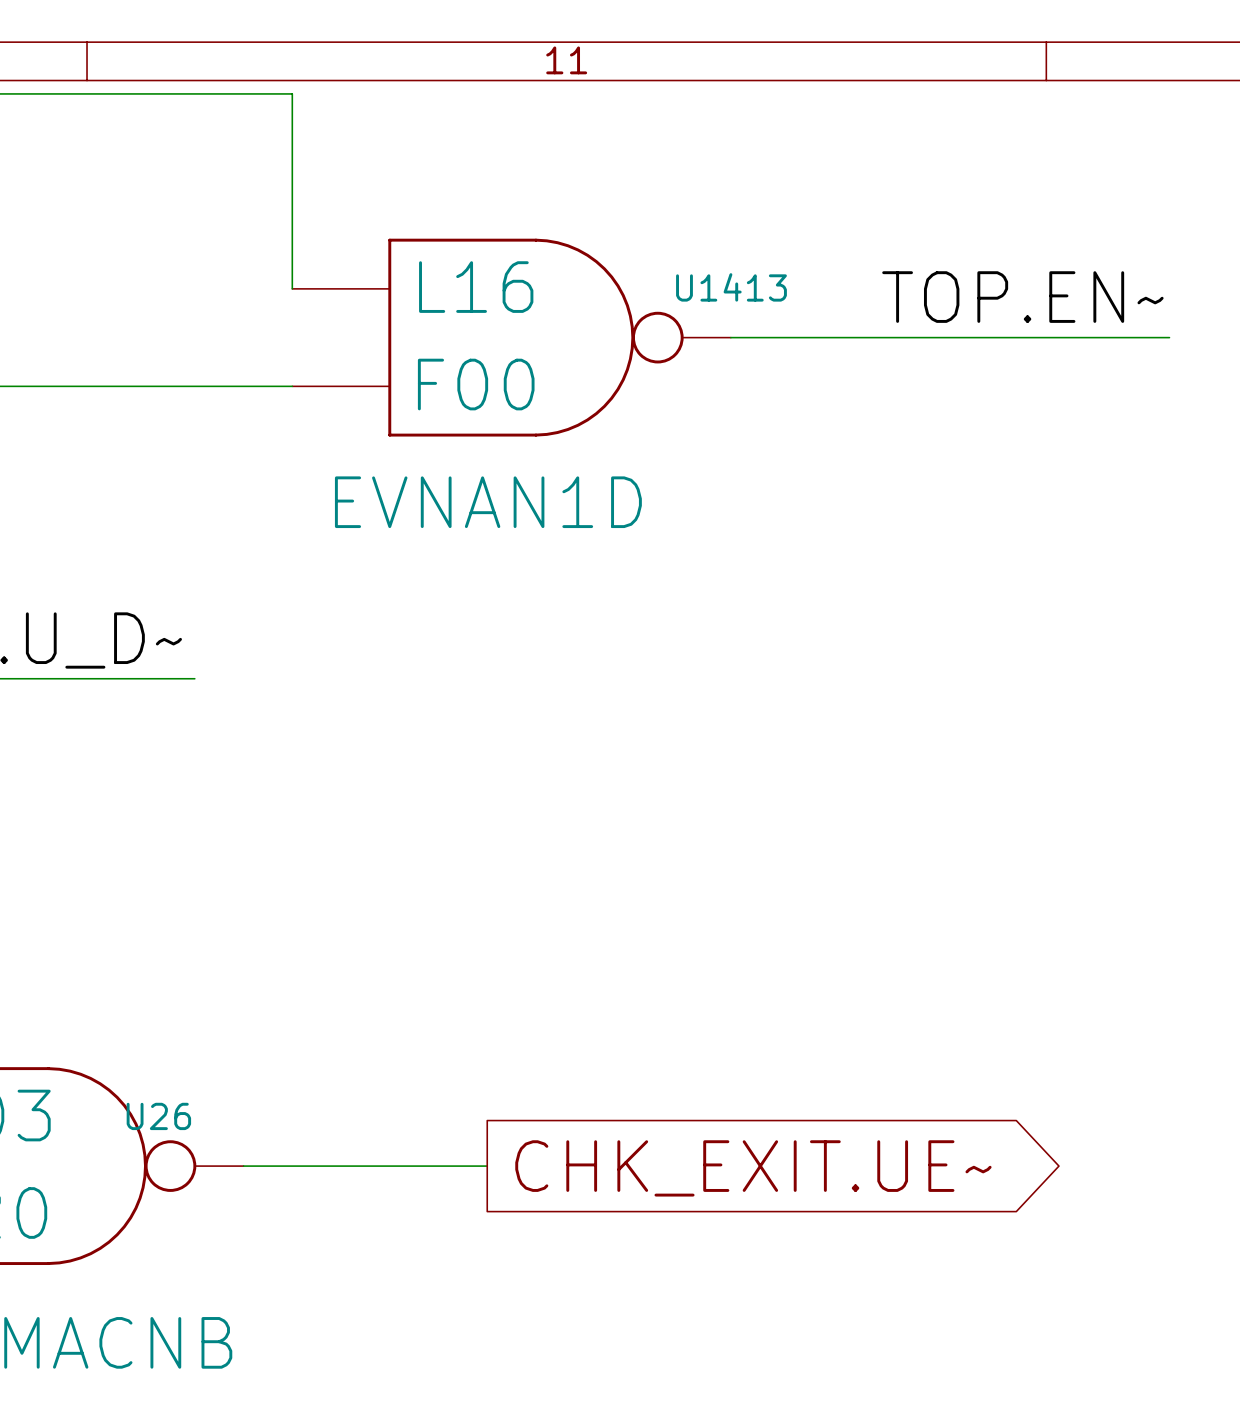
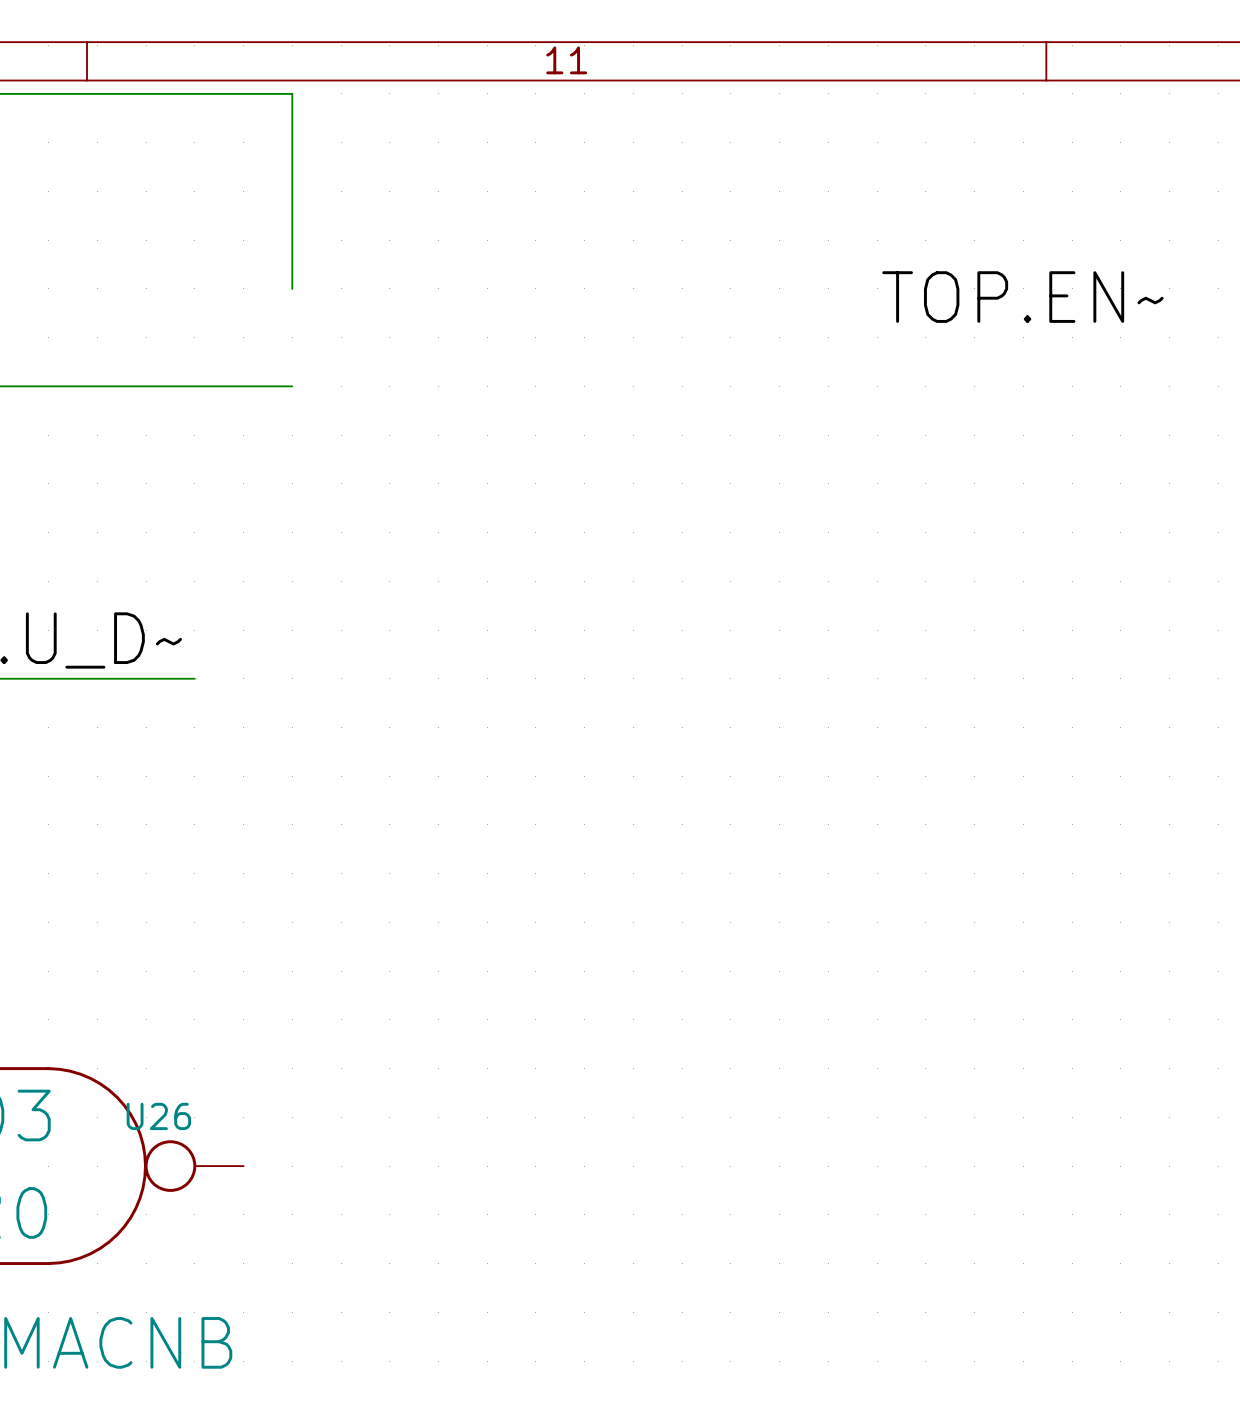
U1413: F00 (511, 337) -> none
wire: (730, 337) (1169, 337) -> none
wire: (243, 1166) (487, 1166) -> none
global label: CHK_EXIT.UE~ (753, 1168) -> none

